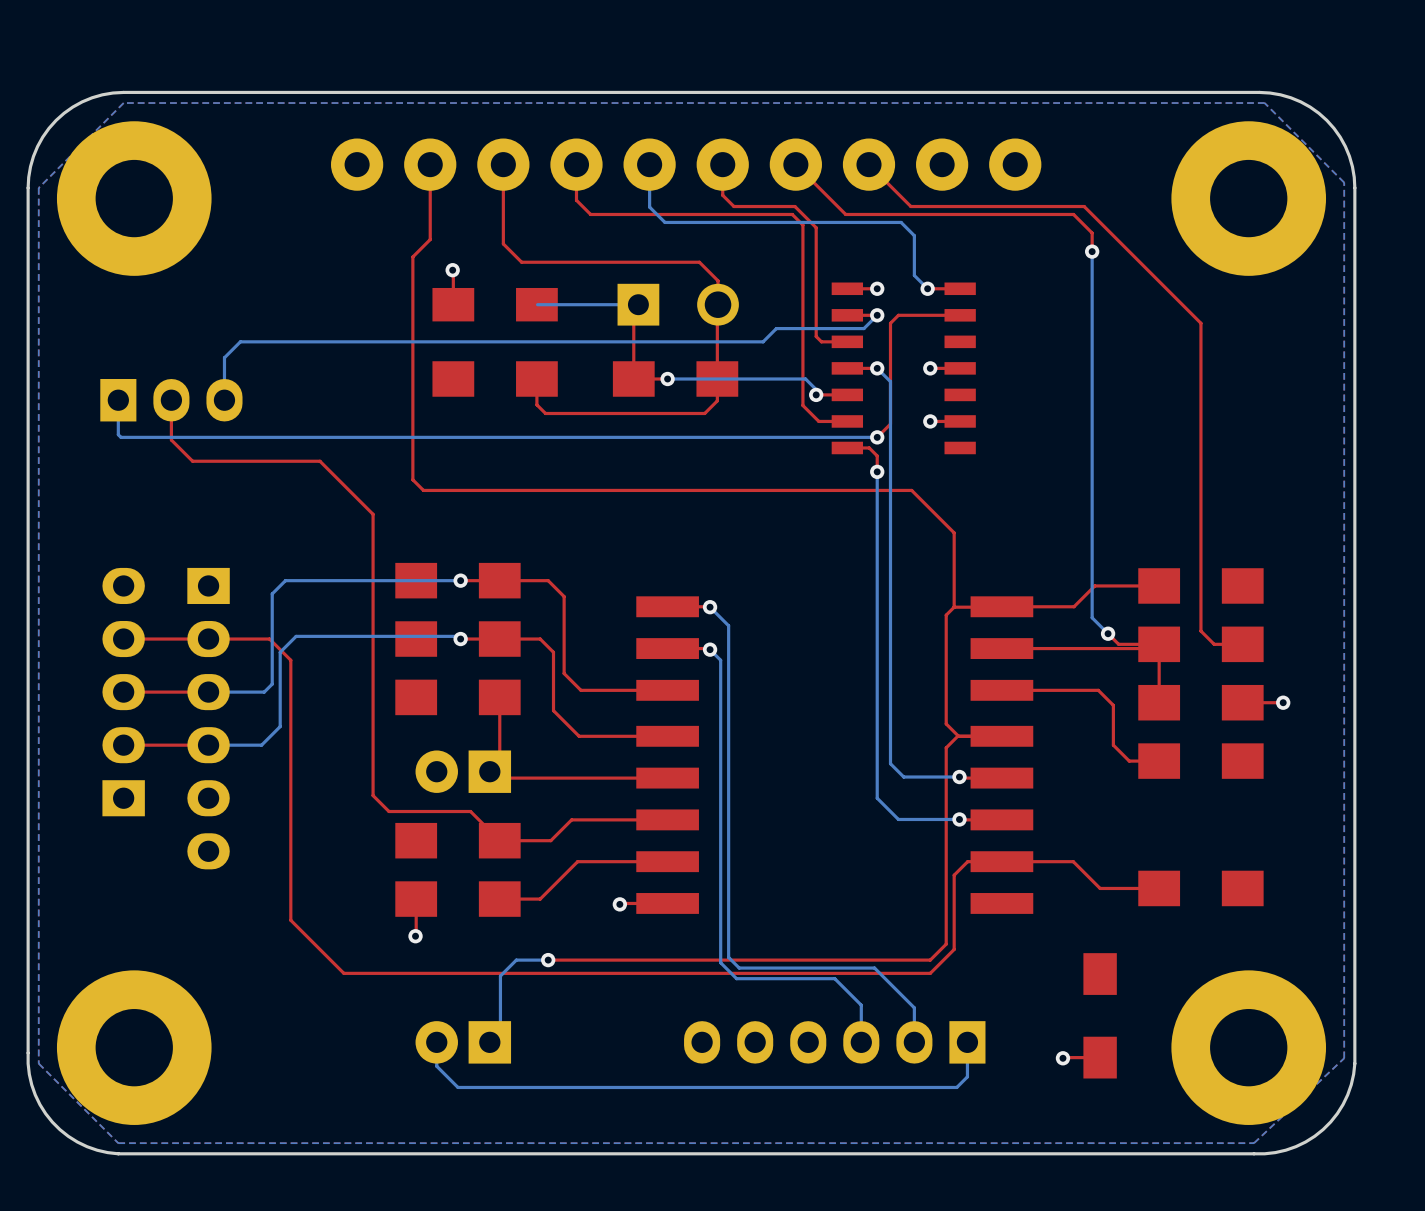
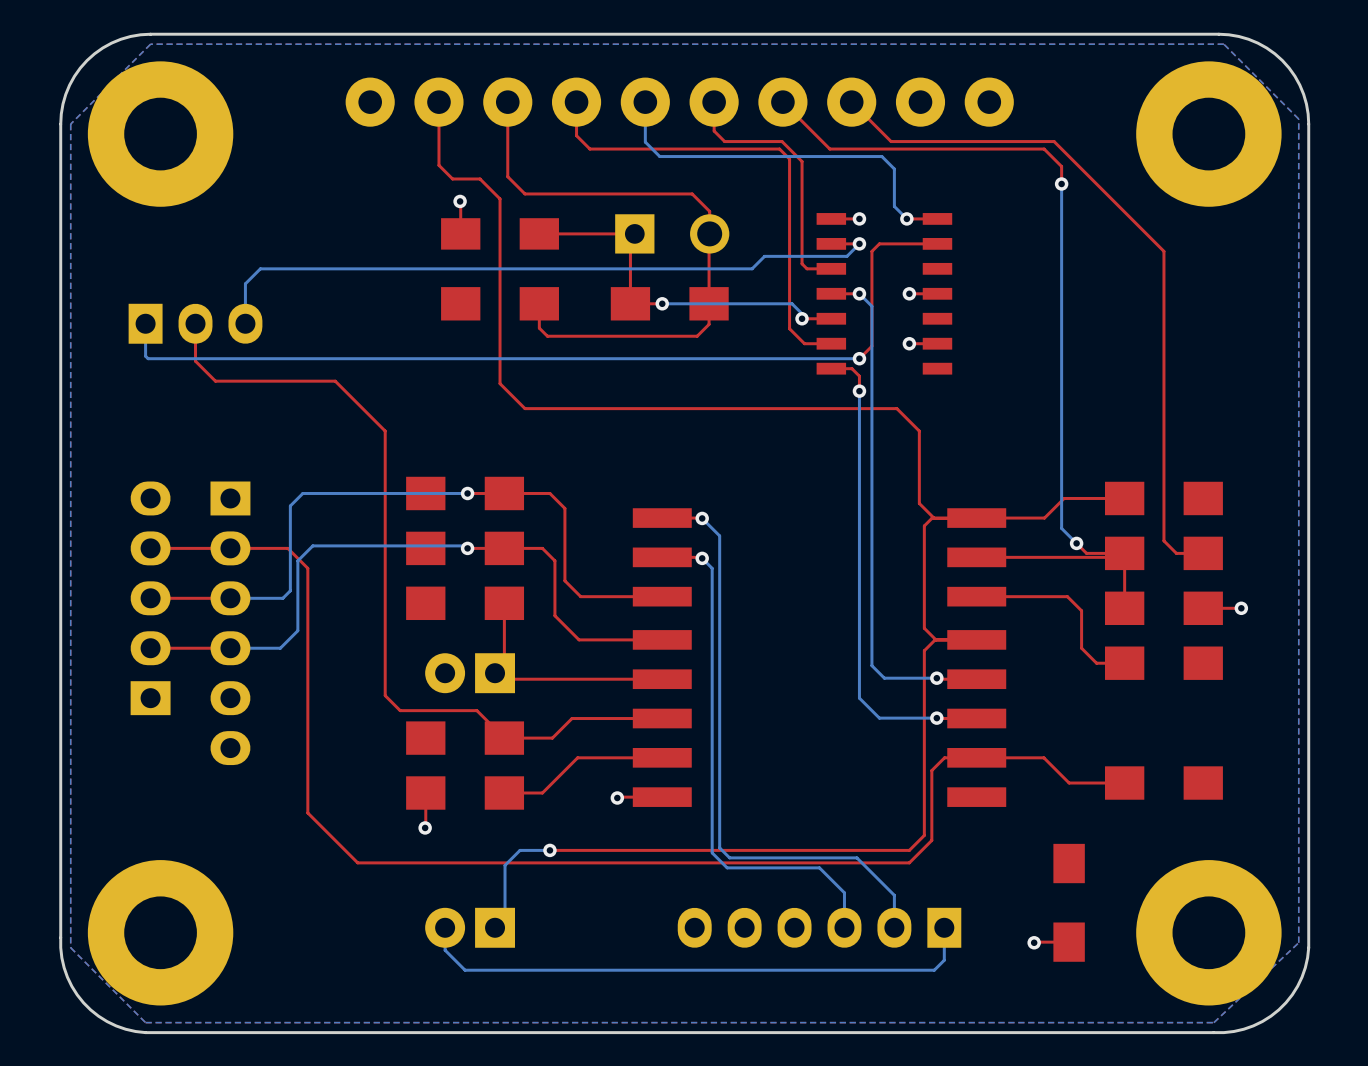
top track: (430, 231) (430, 239) (412, 256) (412, 479) (423, 490) (521, 490) -> (438, 165) (452, 178) (480, 178) (500, 198) (500, 383) (524, 408)
bottom track: (638, 304) (537, 304) -> none
top track: none -> (634, 233) (539, 233)
top track: (911, 490) (954, 532) (954, 607) -> (891, 408) (896, 408) (919, 431) (919, 503) (933, 518) (976, 518)

